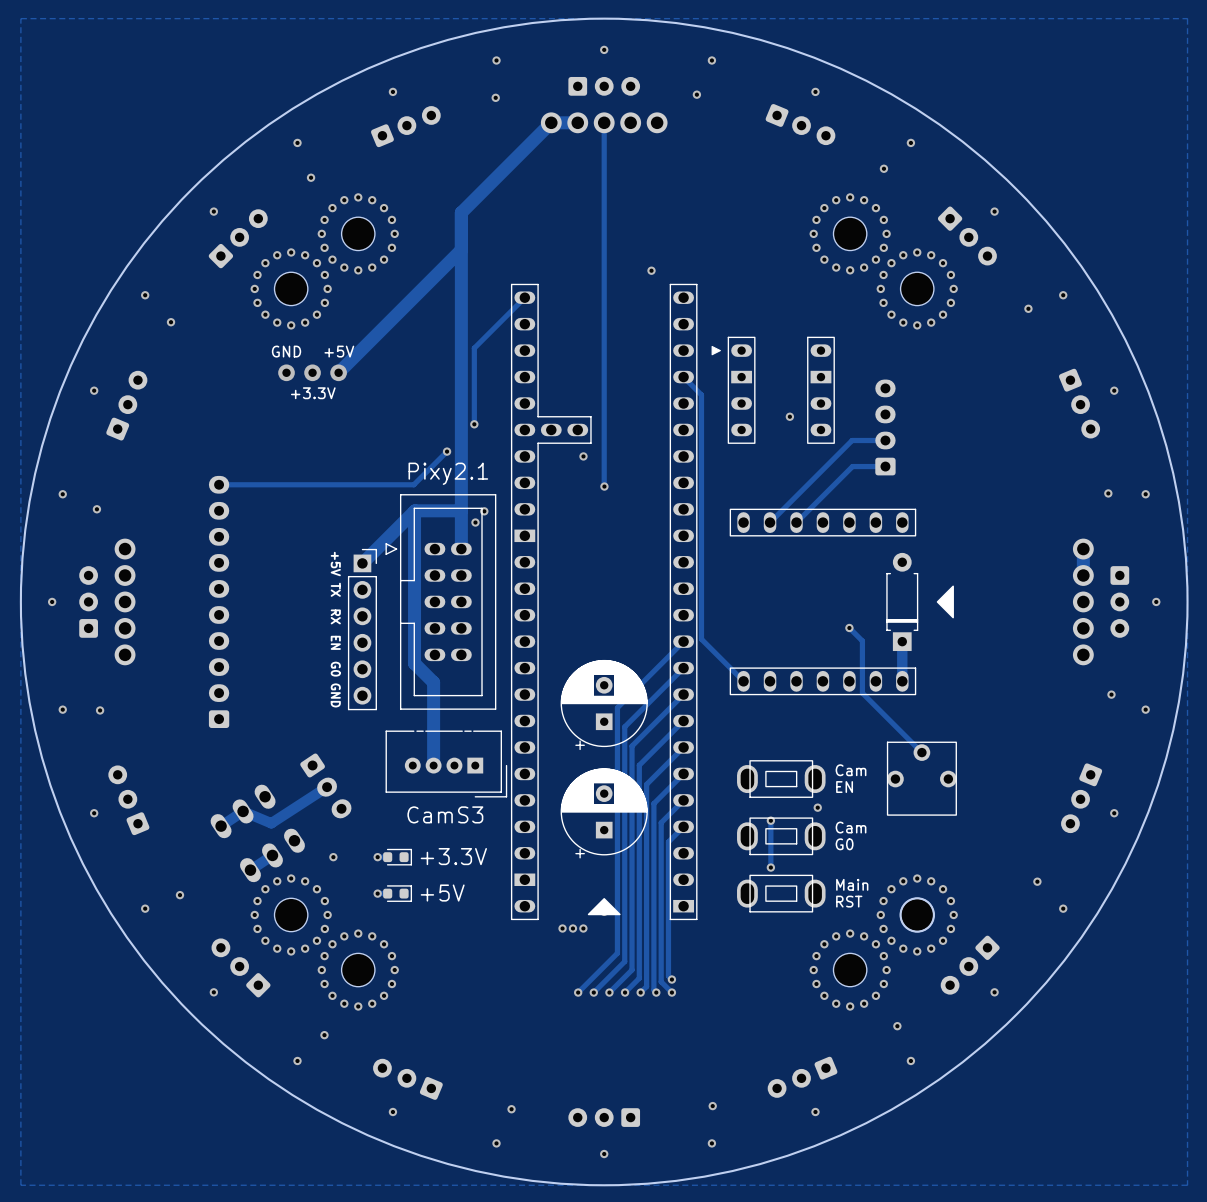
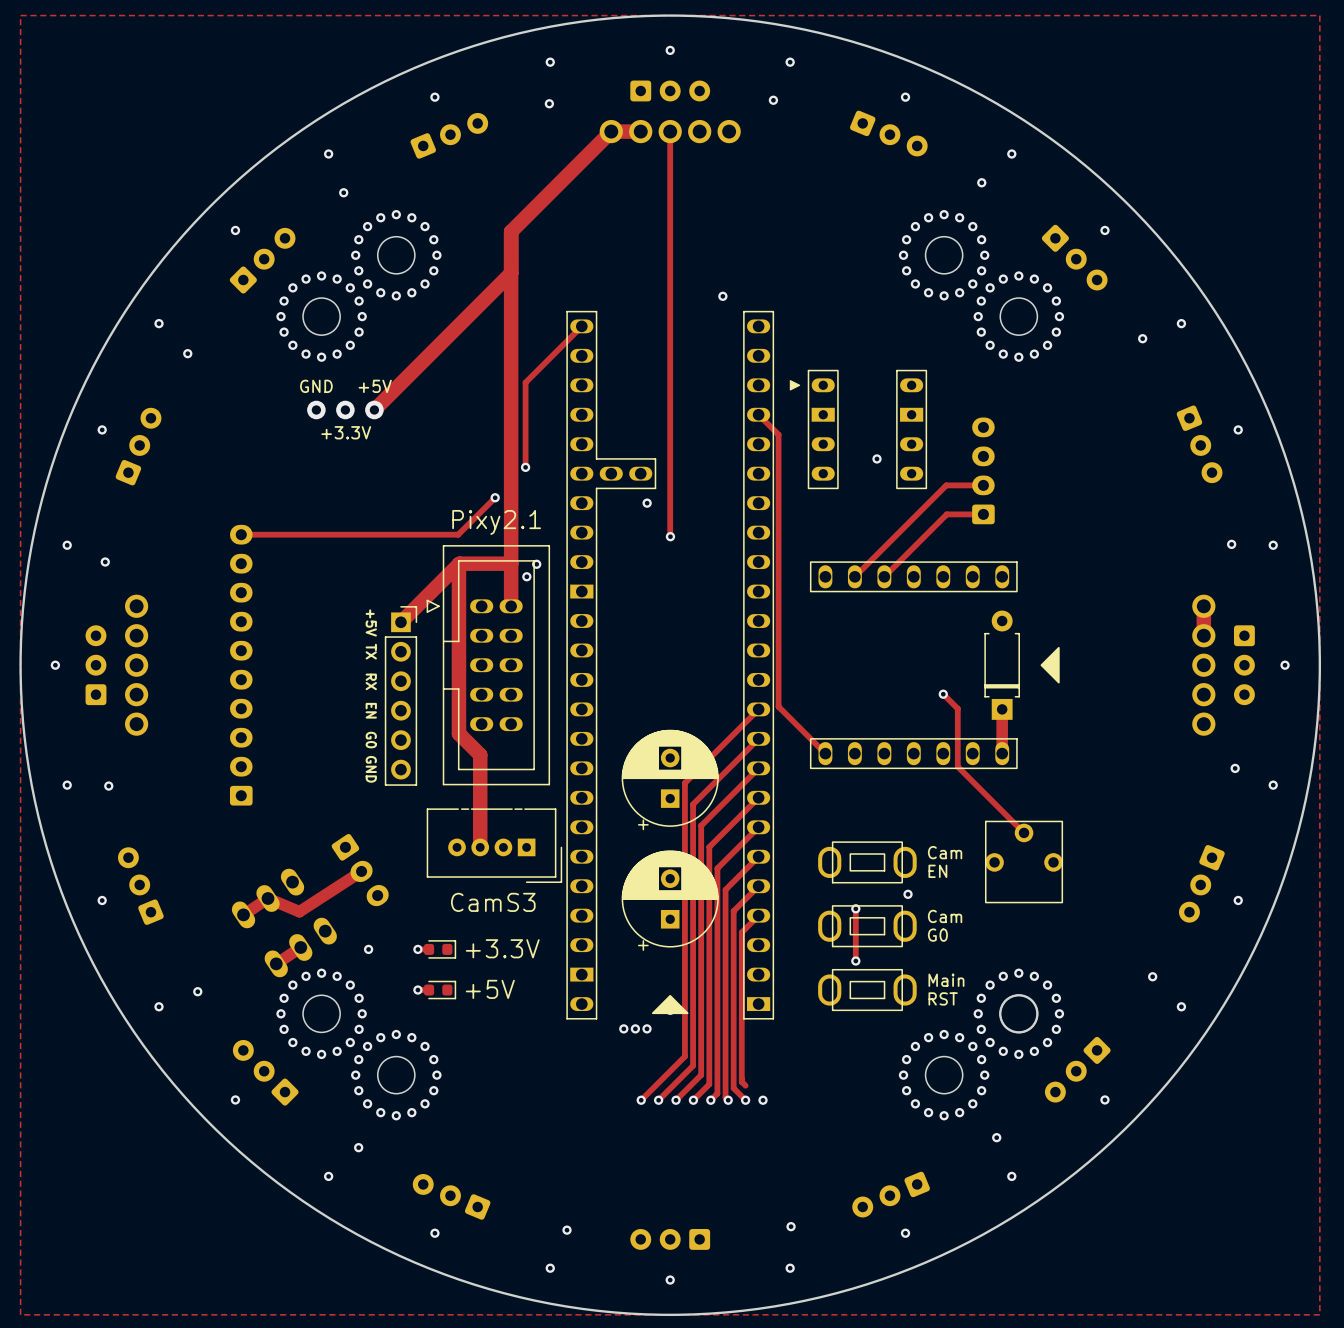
via position: (671, 979) -> (763, 1100)

